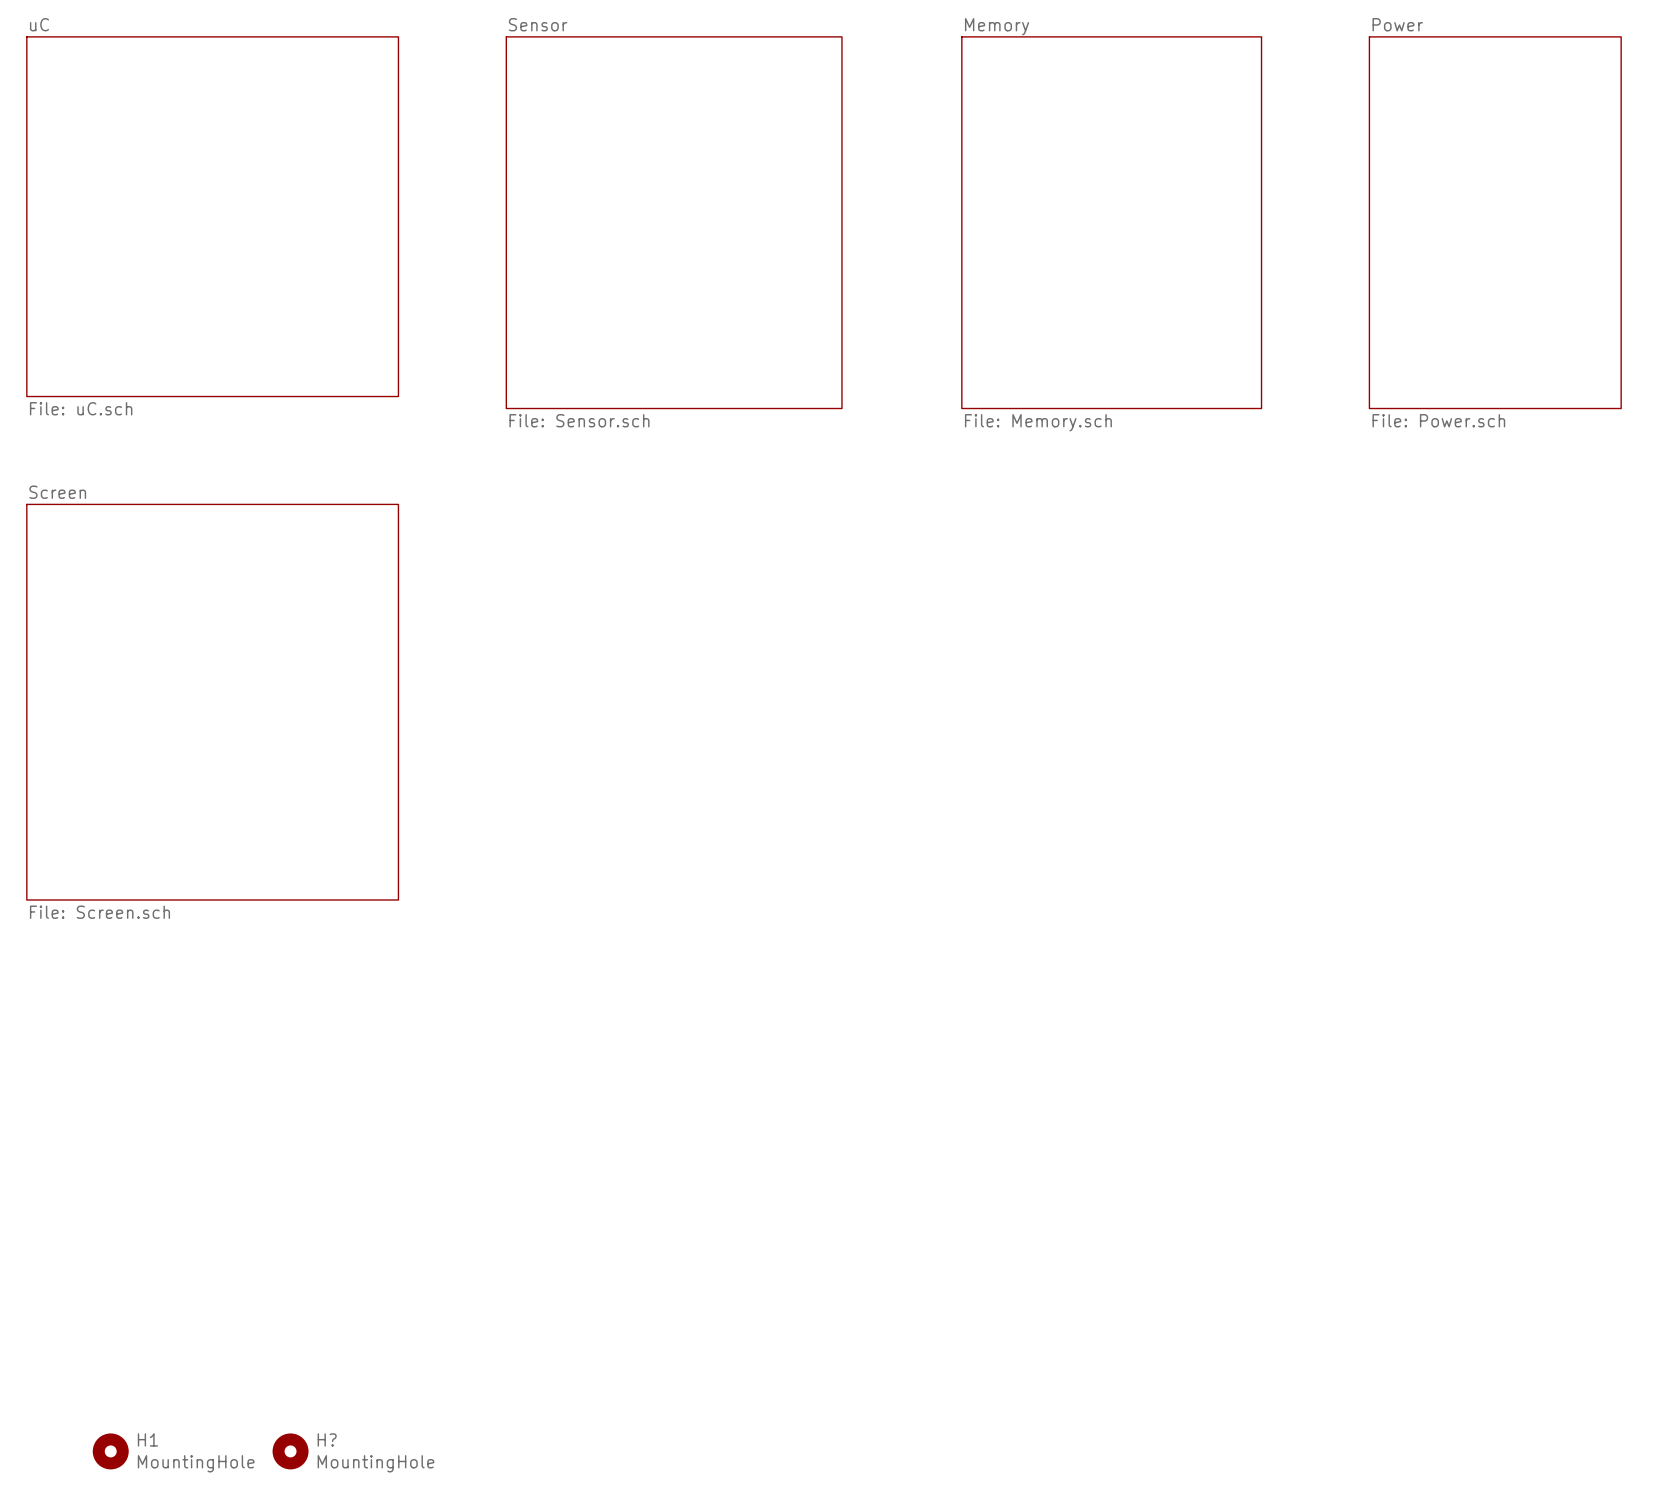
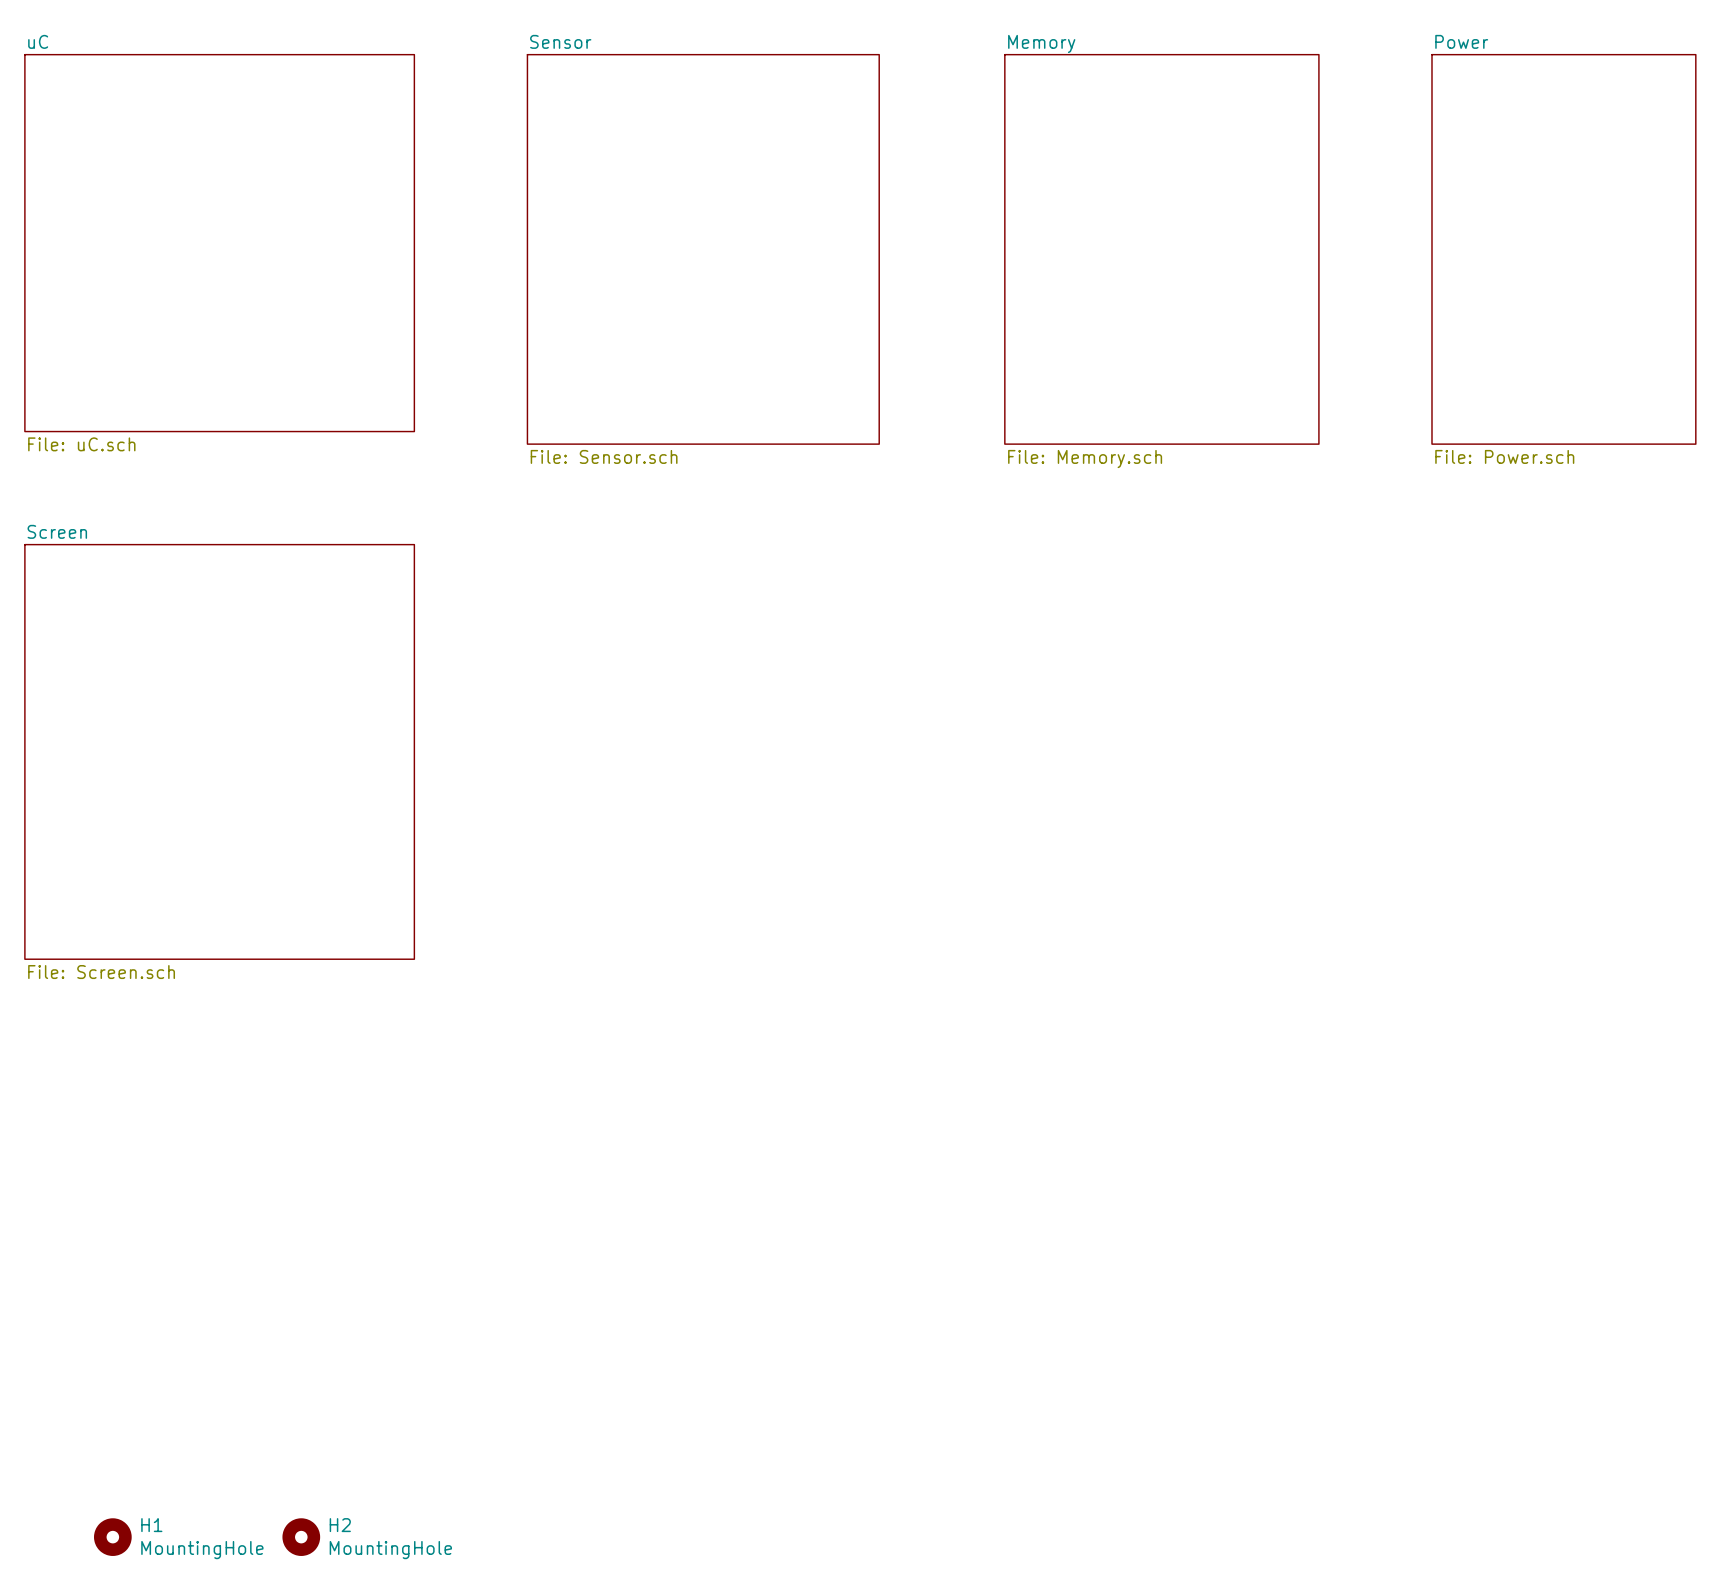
H? name: H? (327, 1439) -> H2 (340, 1525)

